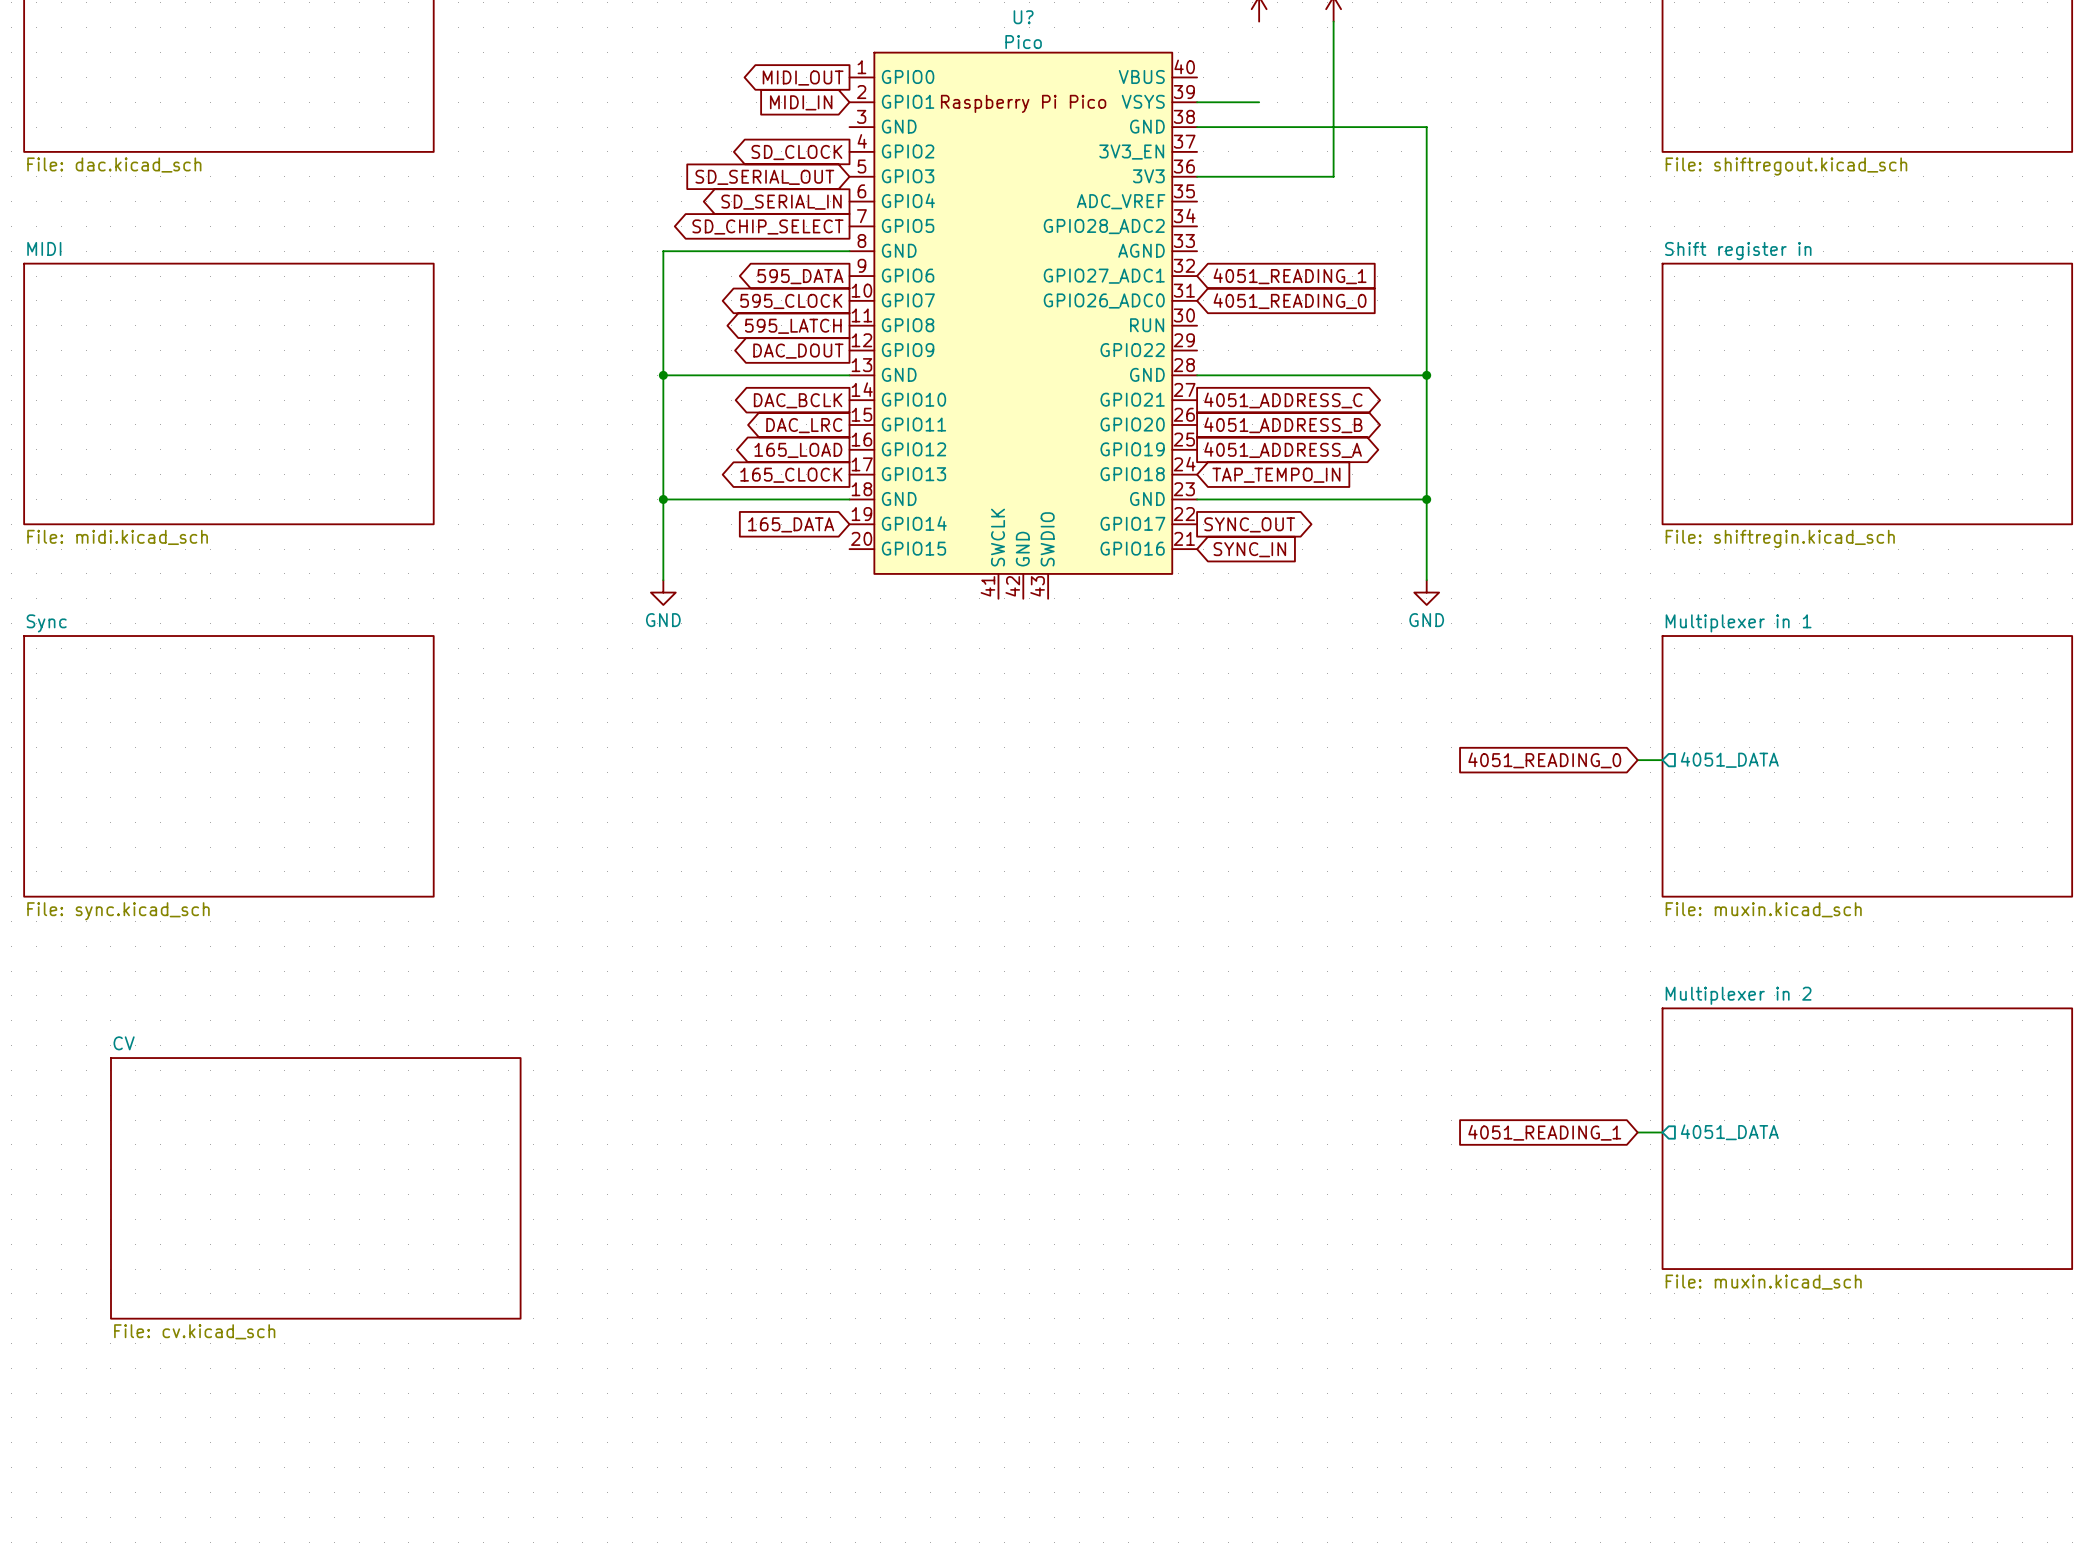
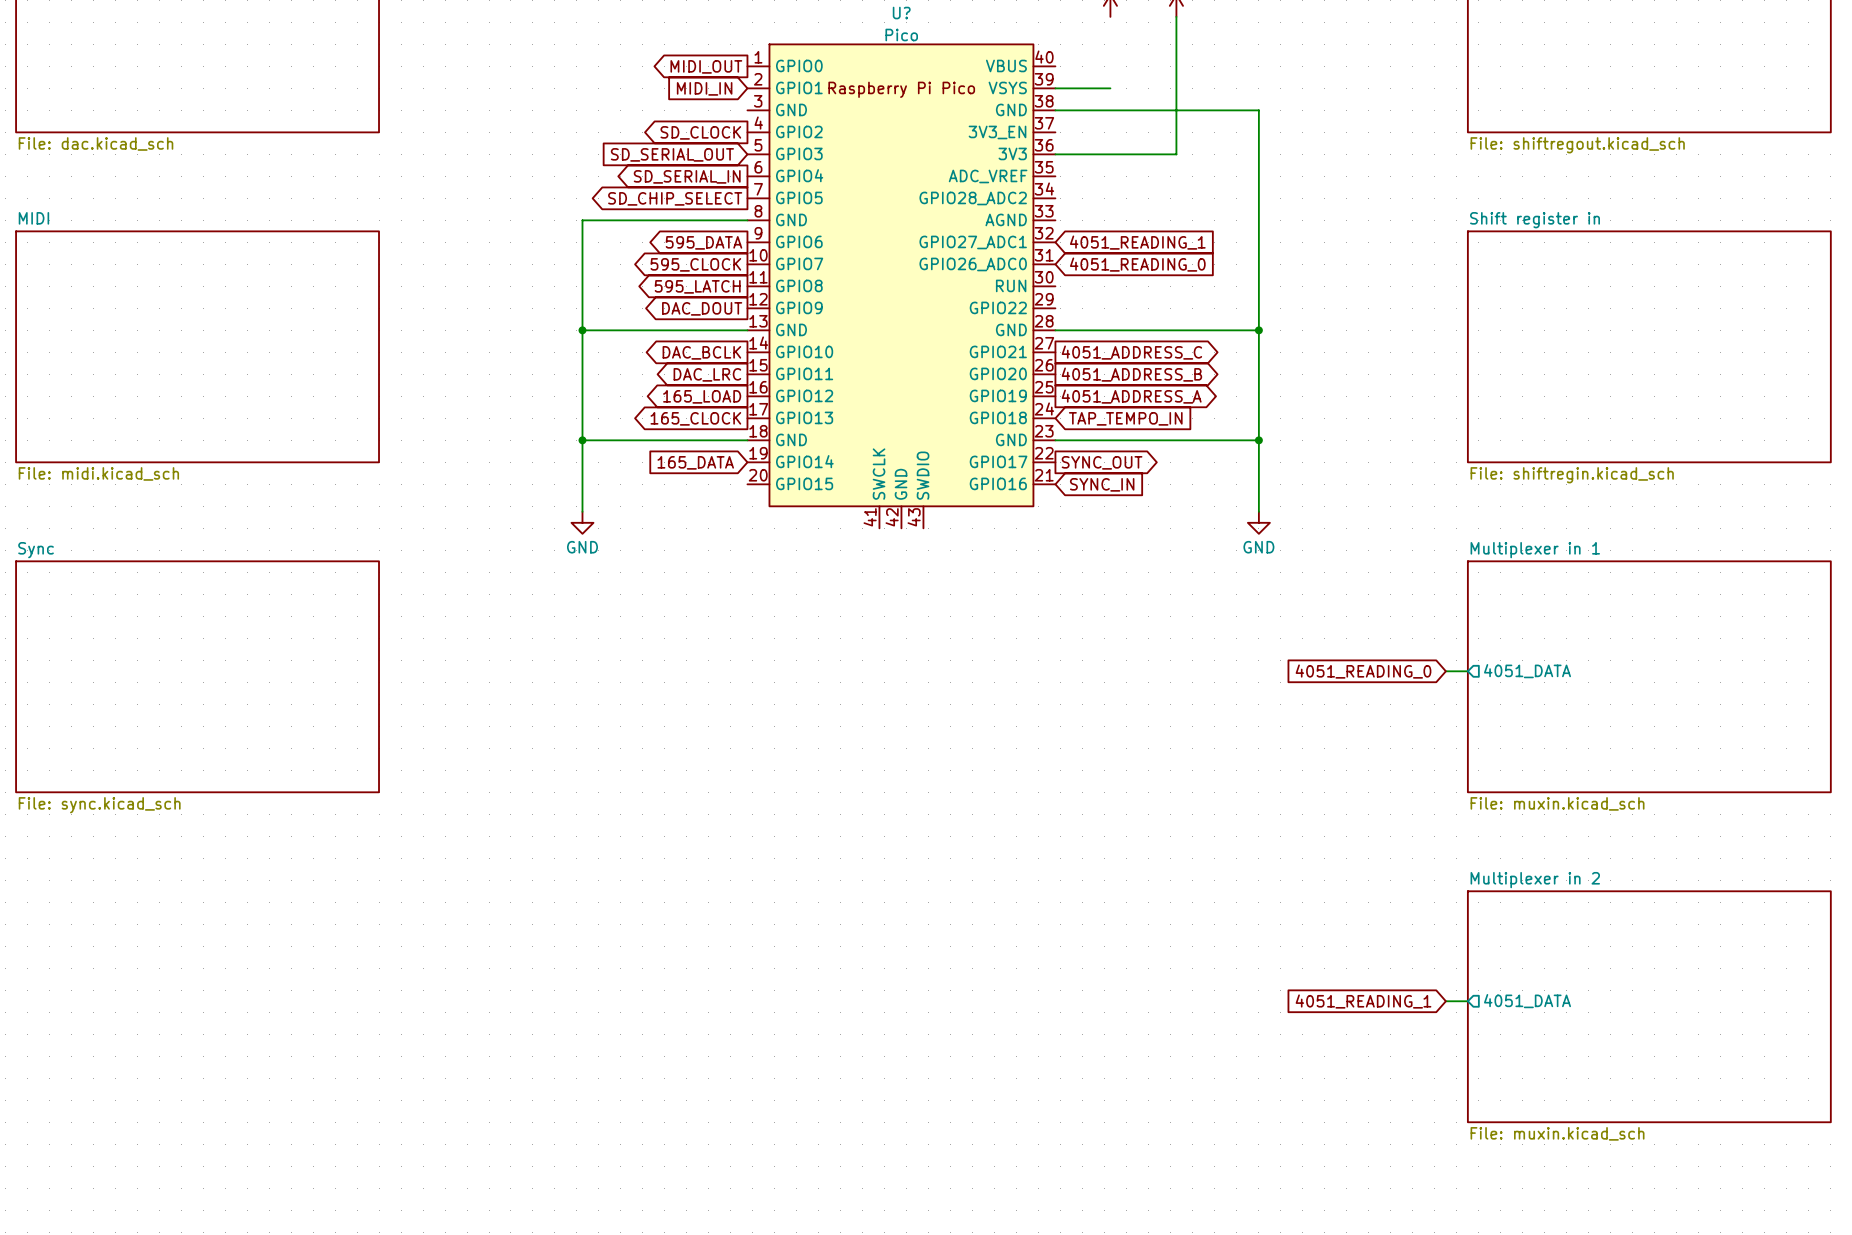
sheet CV: File: cv.kicad_sch (315, 1188) -> none

